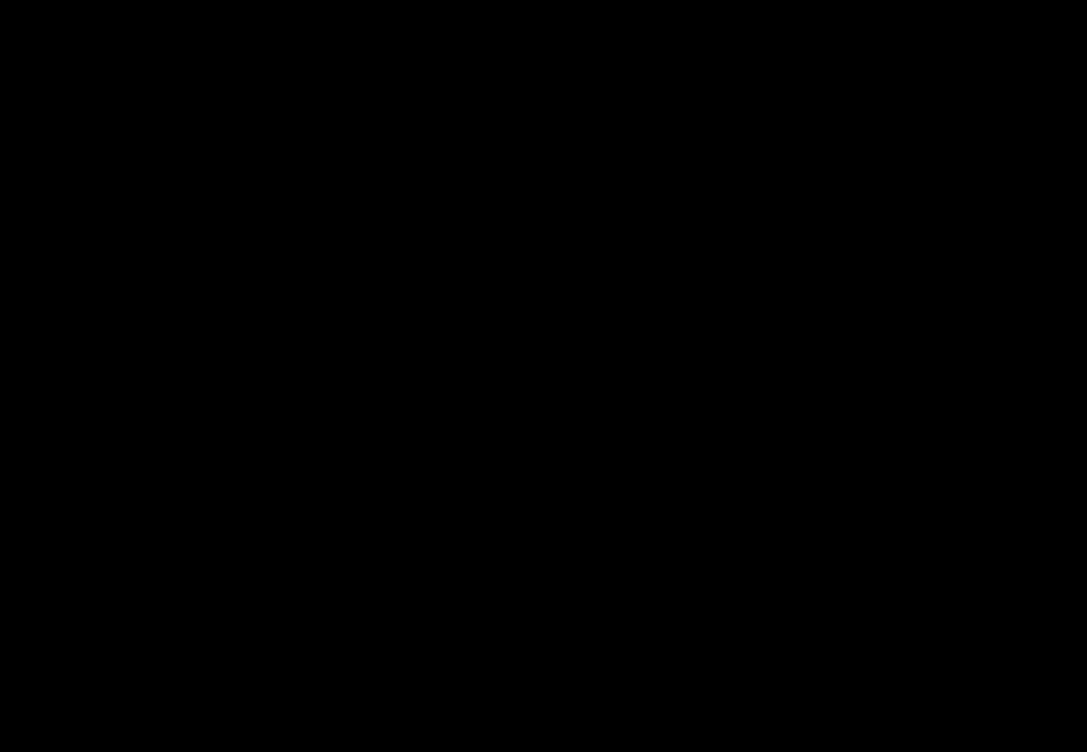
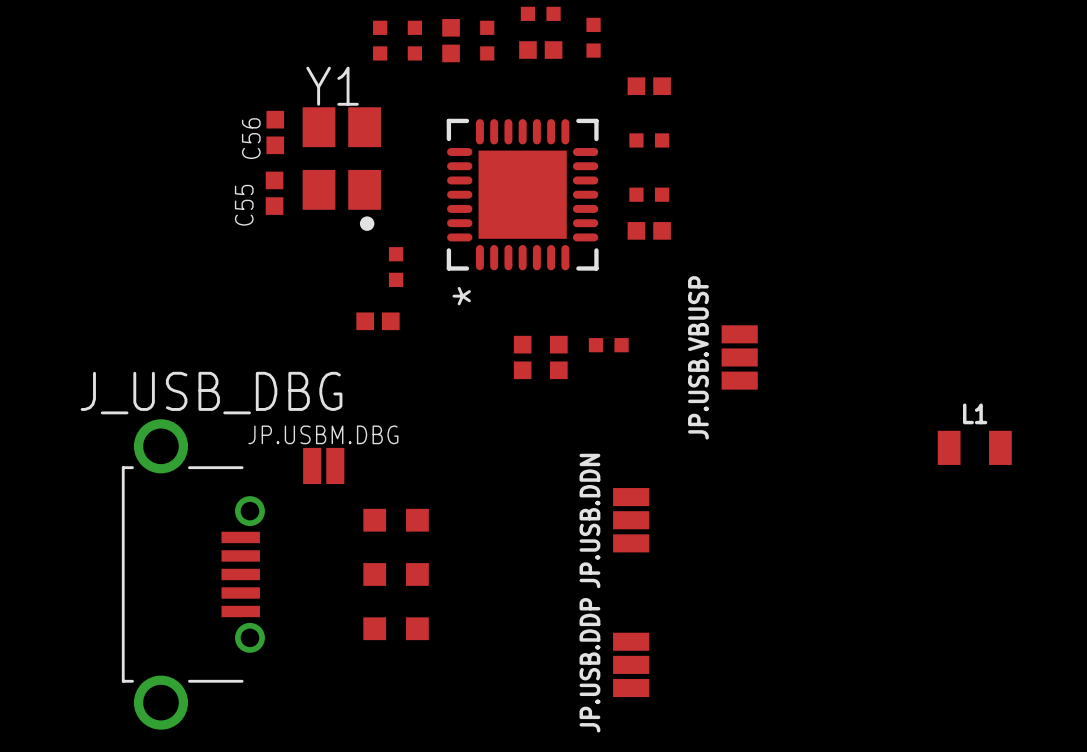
part: none -> (540, 13)
part: none -> (593, 37)
part: none -> (380, 40)
part: none -> (414, 40)
part: none -> (451, 40)
part: none -> (487, 40)
part: none -> (540, 50)
part: none -> (649, 86)
C56: none -> (275, 132)
part: none -> (649, 140)
Y1: none -> (341, 169)
C55: none -> (274, 193)
part: none -> (522, 194)
part: none -> (649, 194)
part: none -> (649, 230)
part: none -> (396, 267)
part: none -> (377, 321)
part: none -> (608, 345)
part: none -> (522, 357)
part: none -> (558, 357)
JP.USB.VBUSP: none -> (739, 357)
L1: none -> (974, 447)
JP.USBM.DBG: none -> (323, 465)
part: none -> (396, 520)
JP.USB.DDN: none -> (631, 520)
J_USB_DBG: none -> (193, 574)
part: none -> (396, 574)
part: none -> (396, 628)
JP.USB.DDP: none -> (631, 664)

